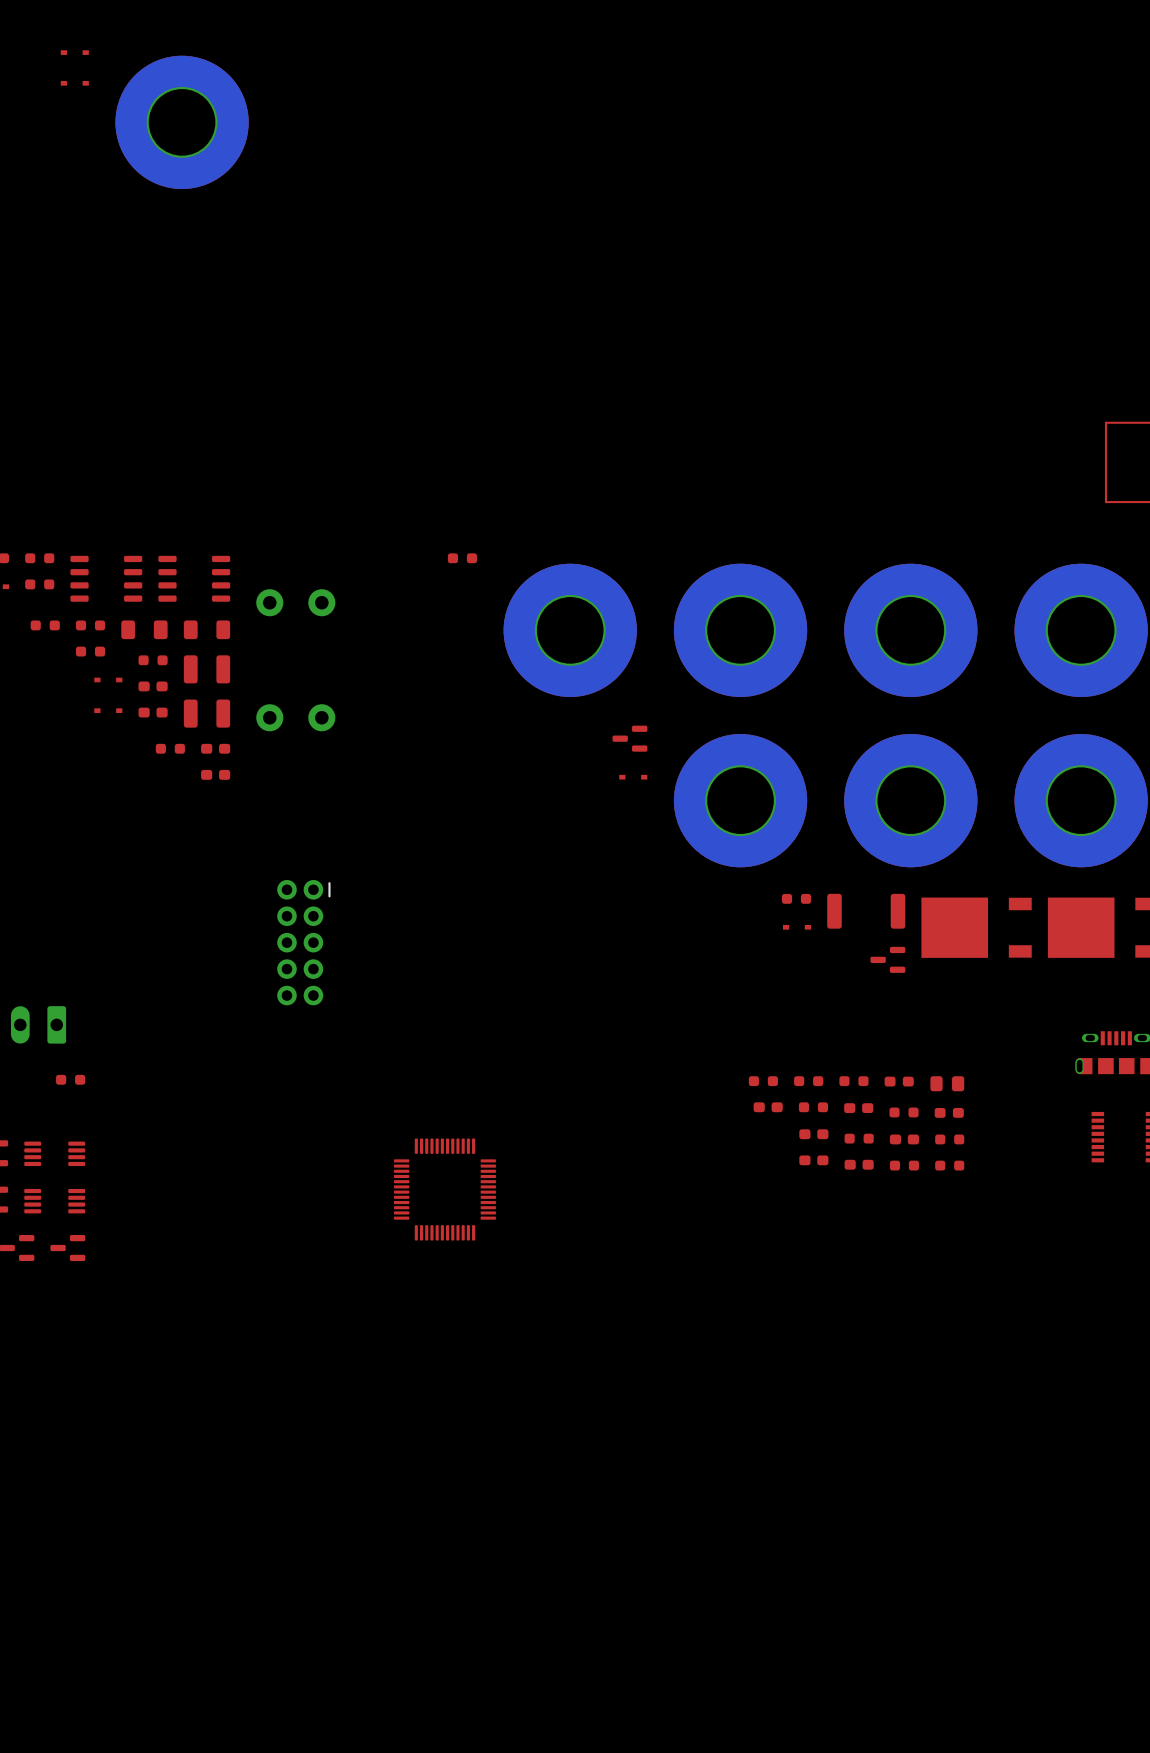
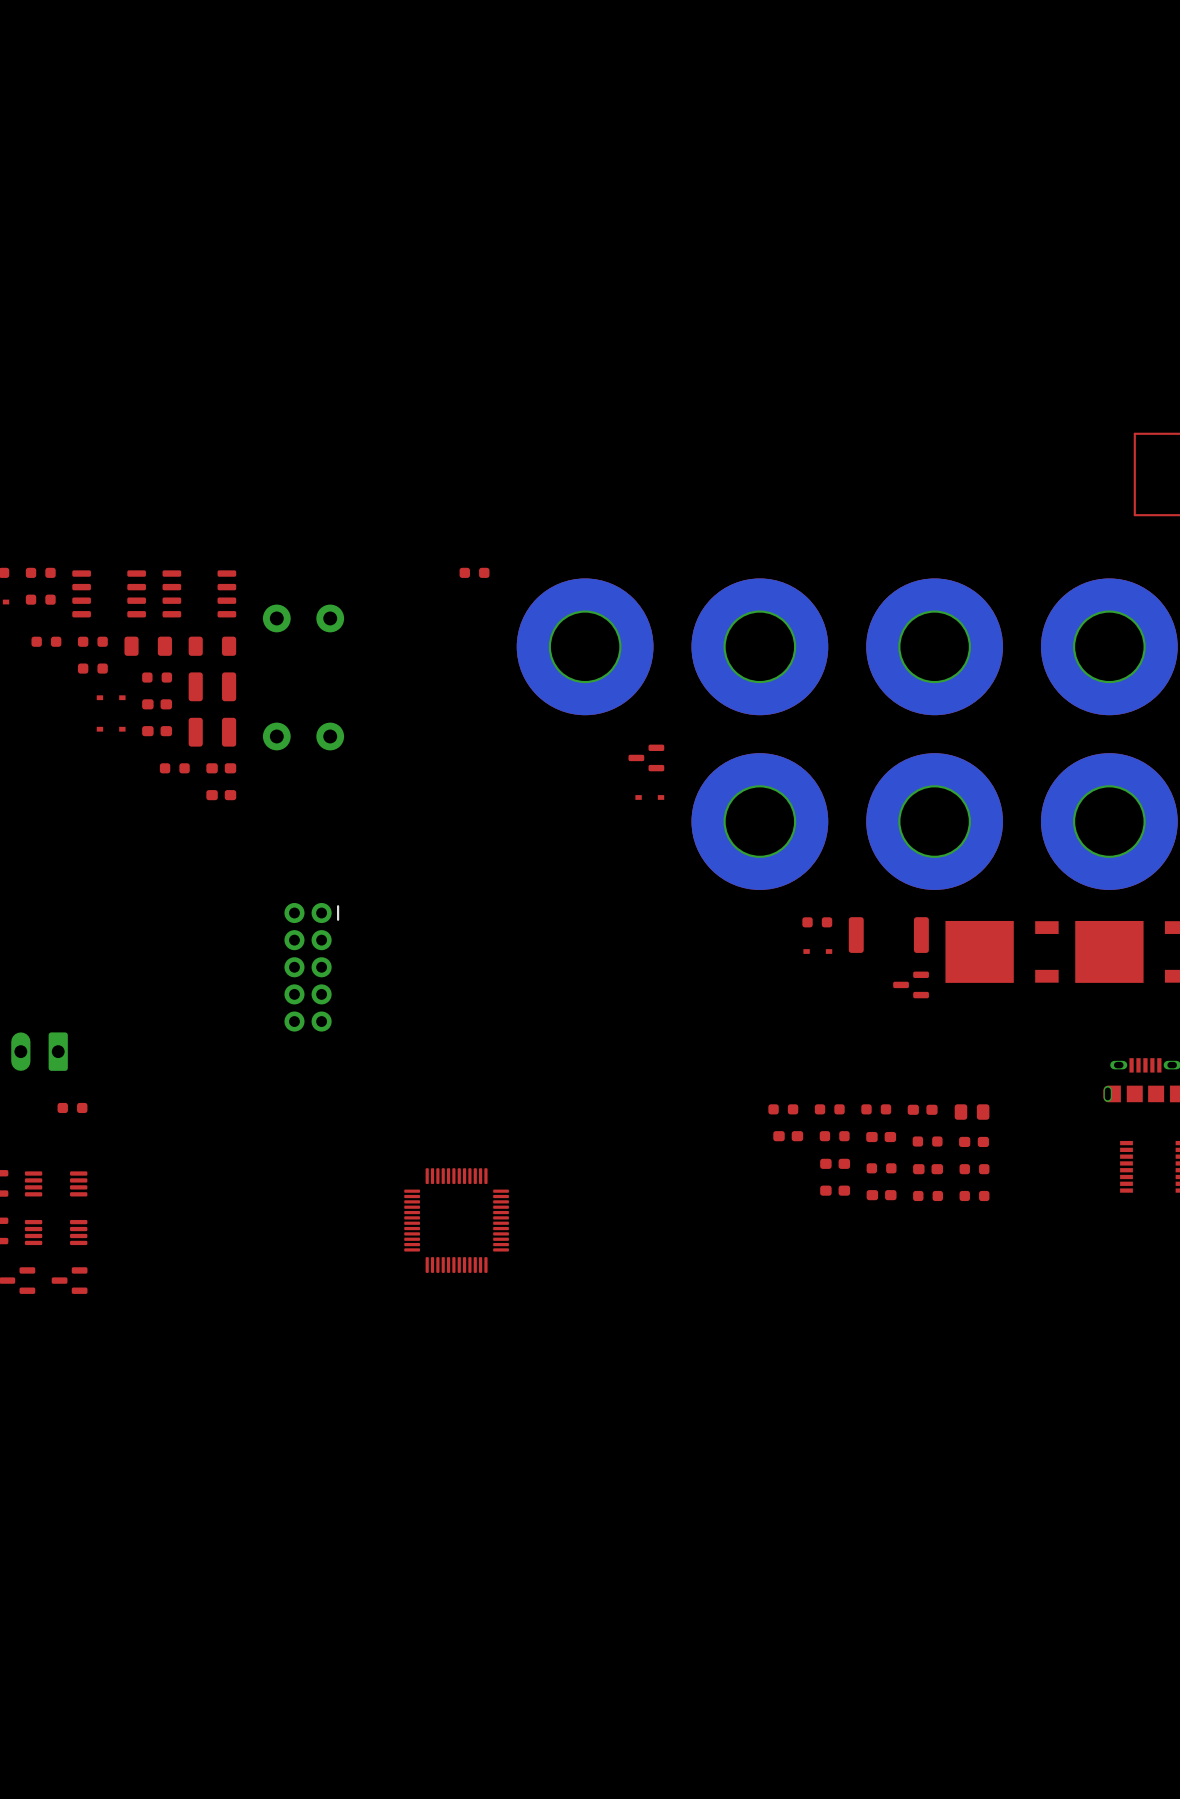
part: (74, 52) -> none
part: (74, 83) -> none
part: (182, 122) -> none

